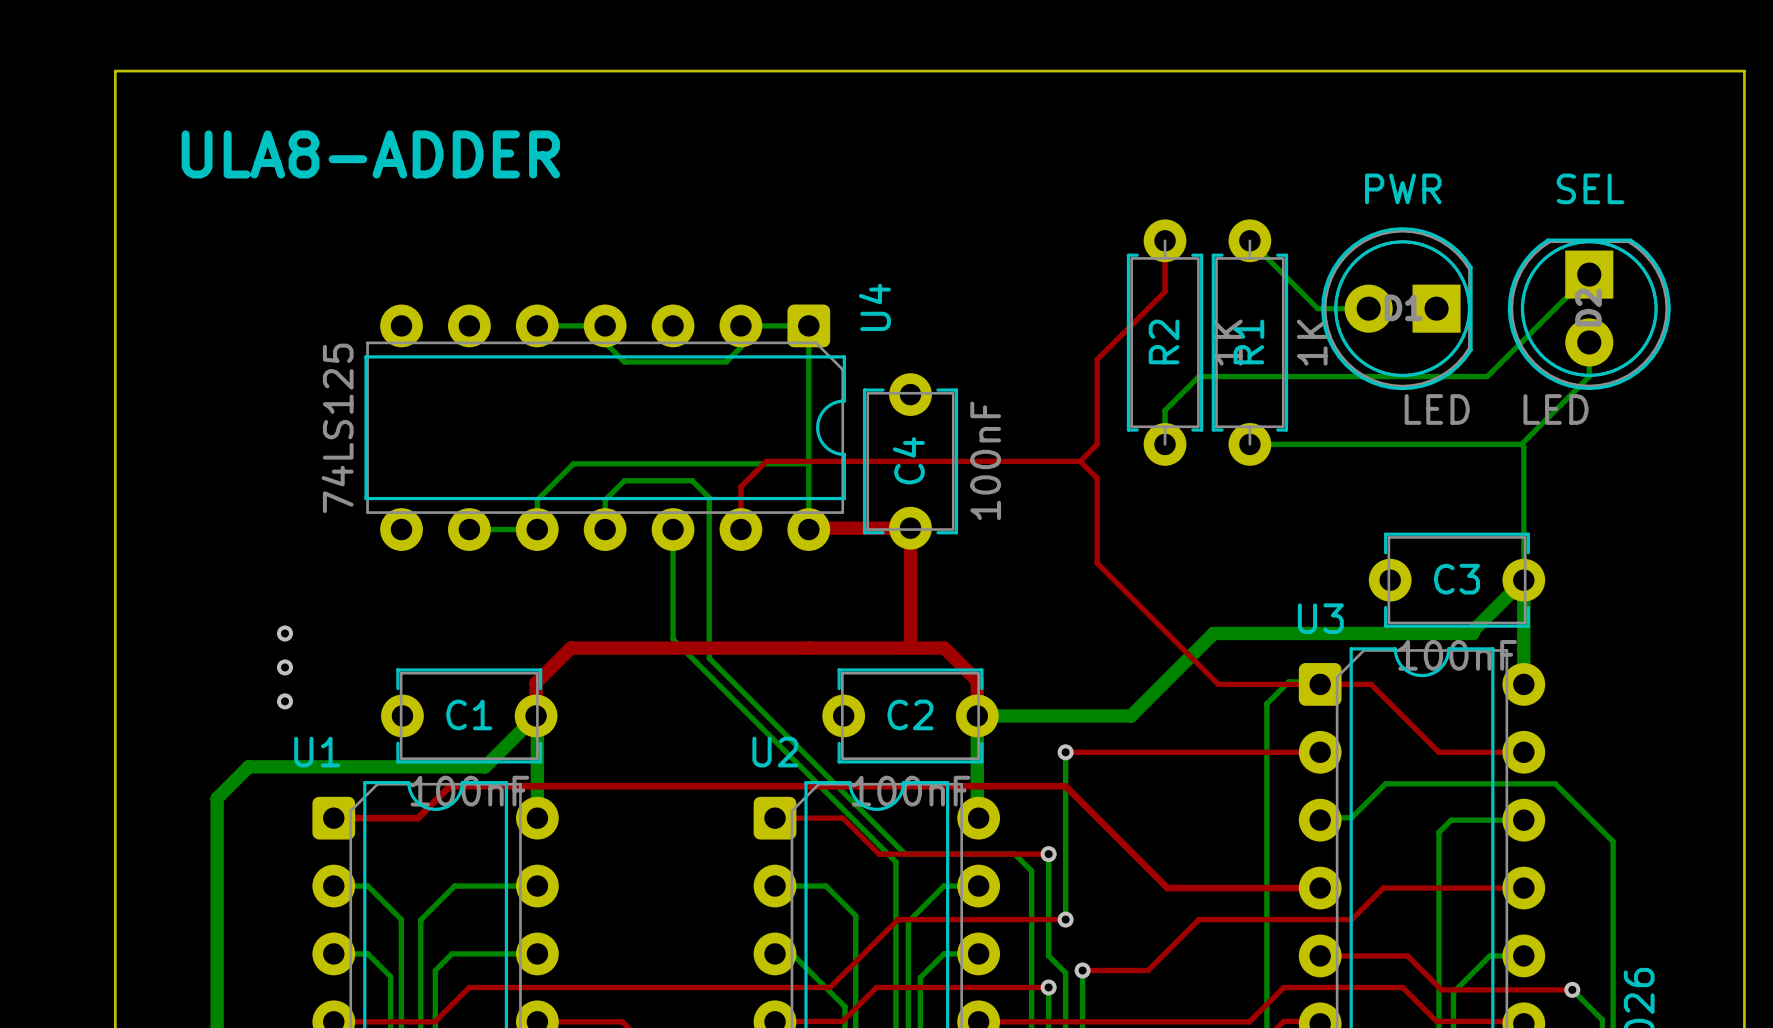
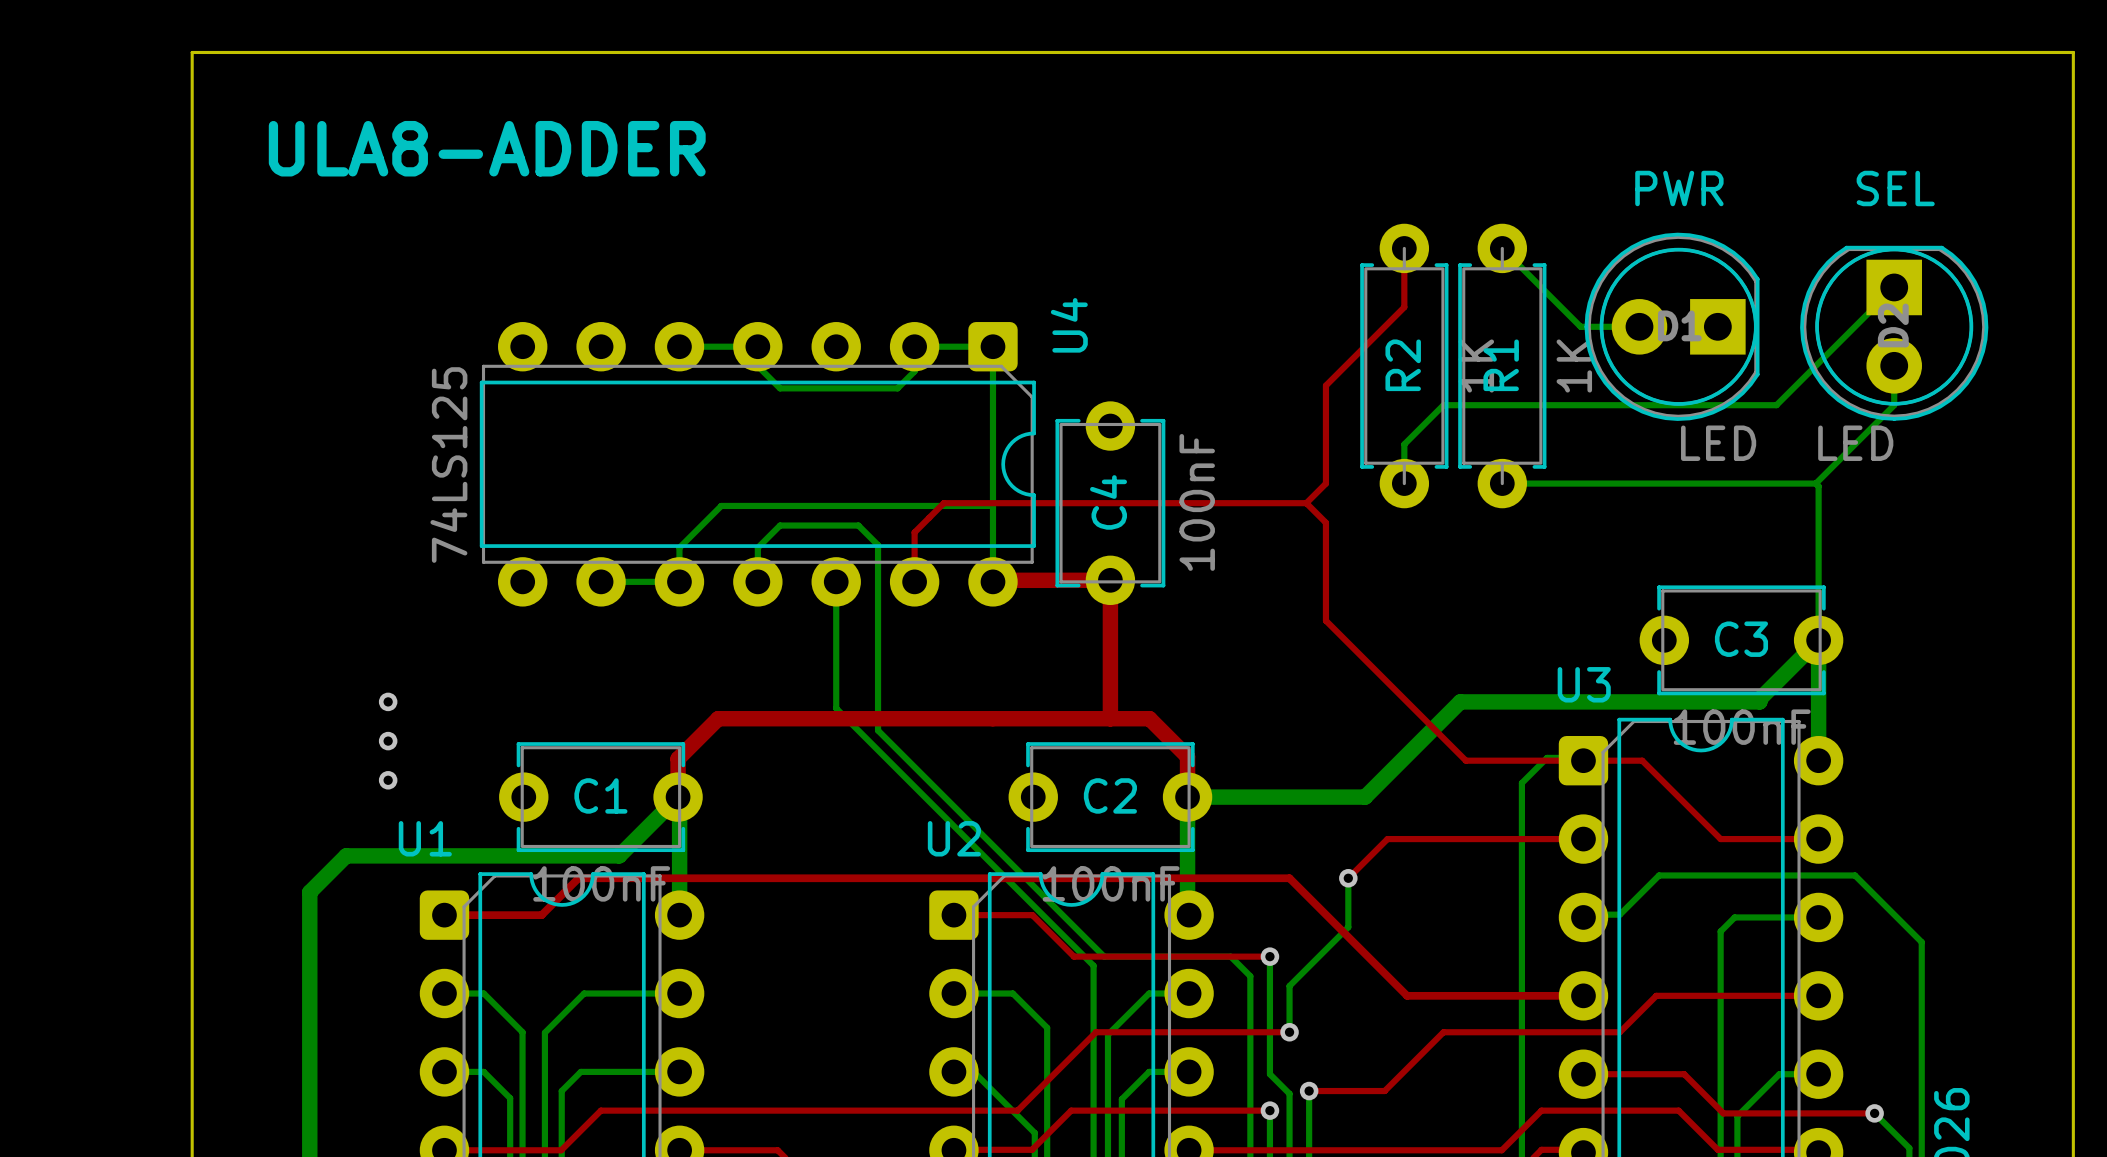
top track: (1065, 752) (1150, 752) -> (1348, 878) (1387, 839)
bottom track: (1065, 752) (1065, 879) -> (1348, 878) (1348, 927) (1289, 986)
via position: (1065, 752) -> (1348, 878)

